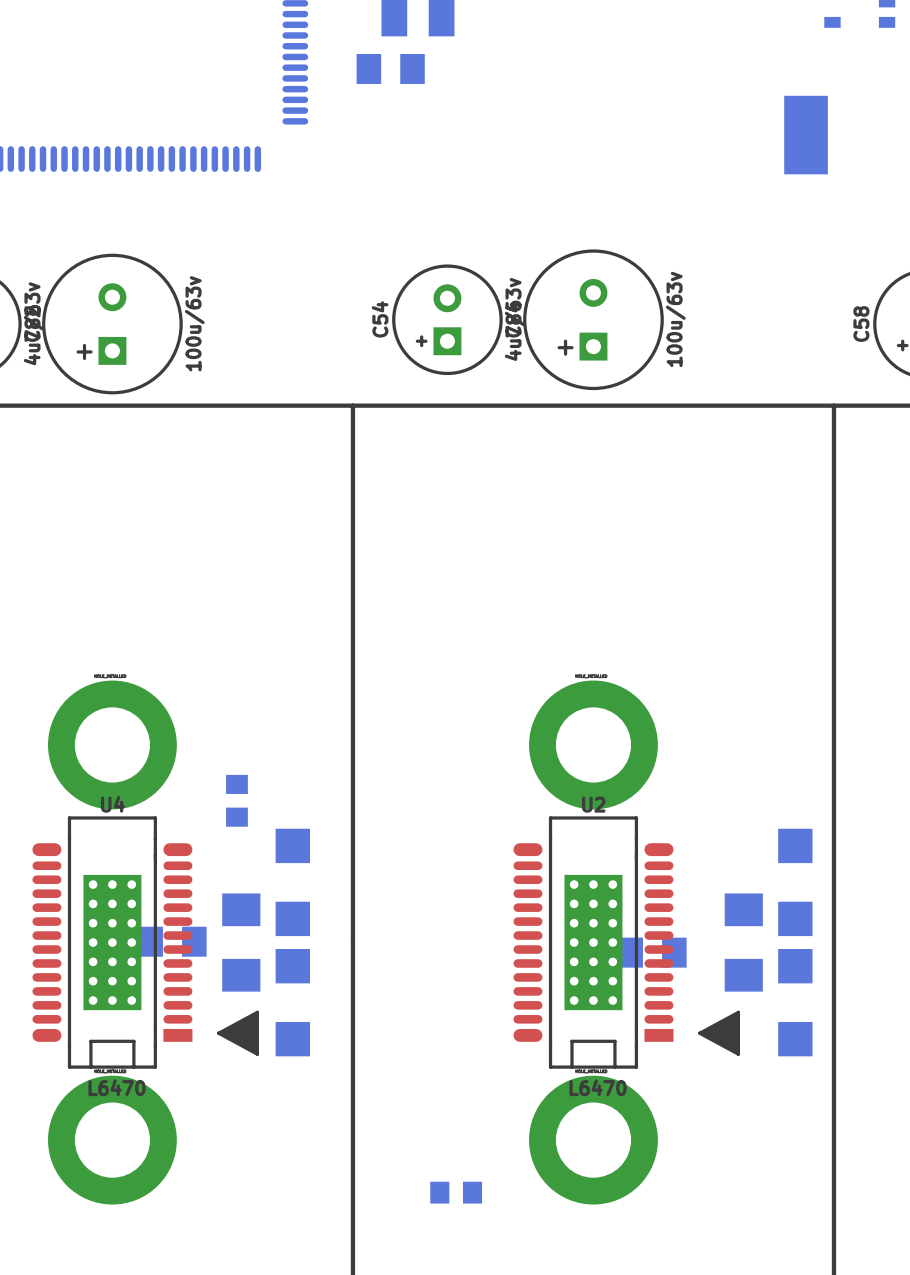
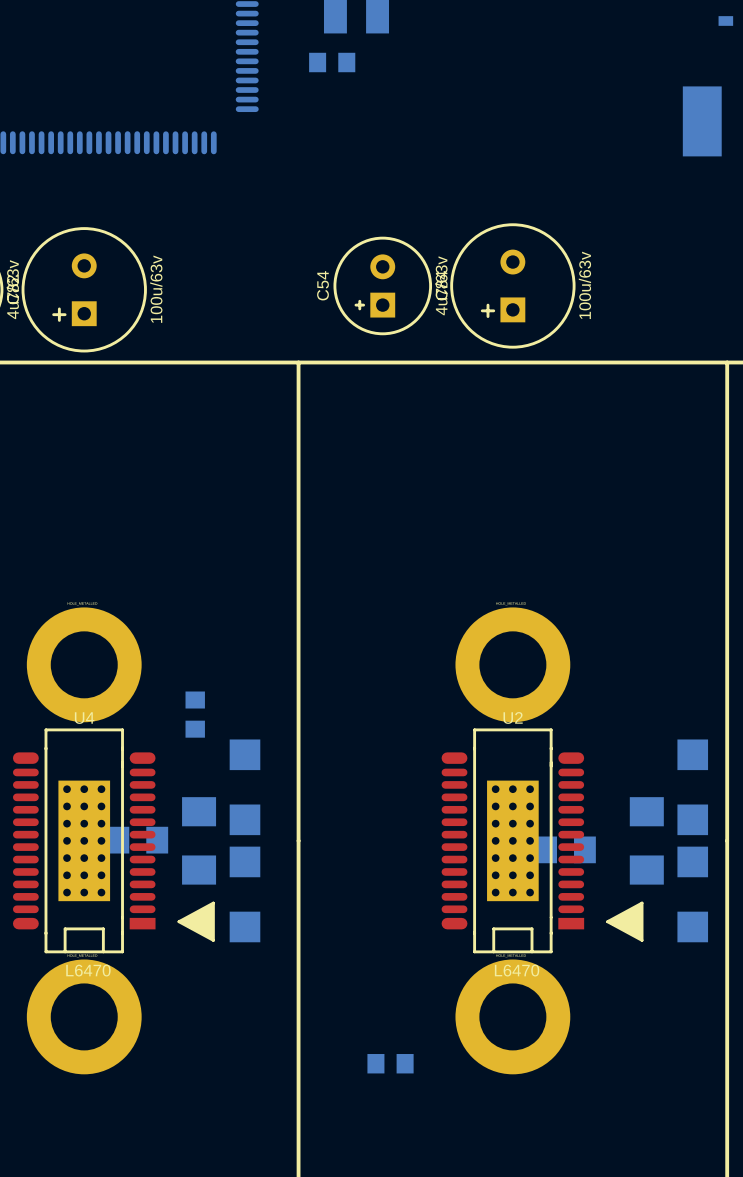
part footprint: [356, 53, 425, 84] -> [309, 52, 356, 73]

